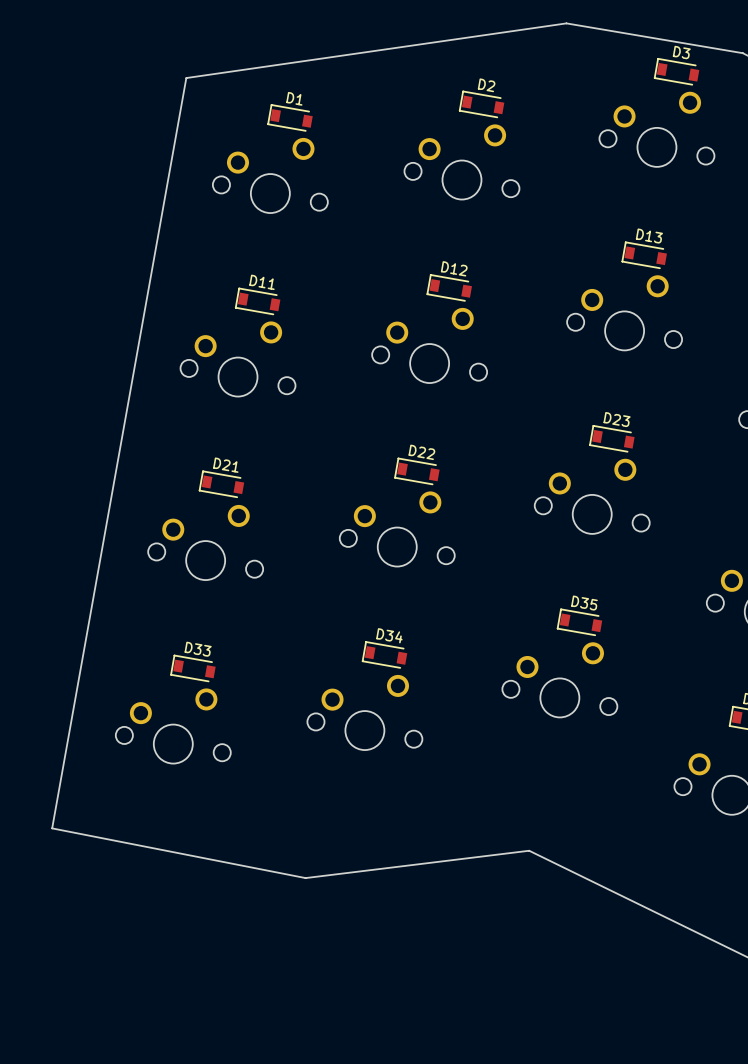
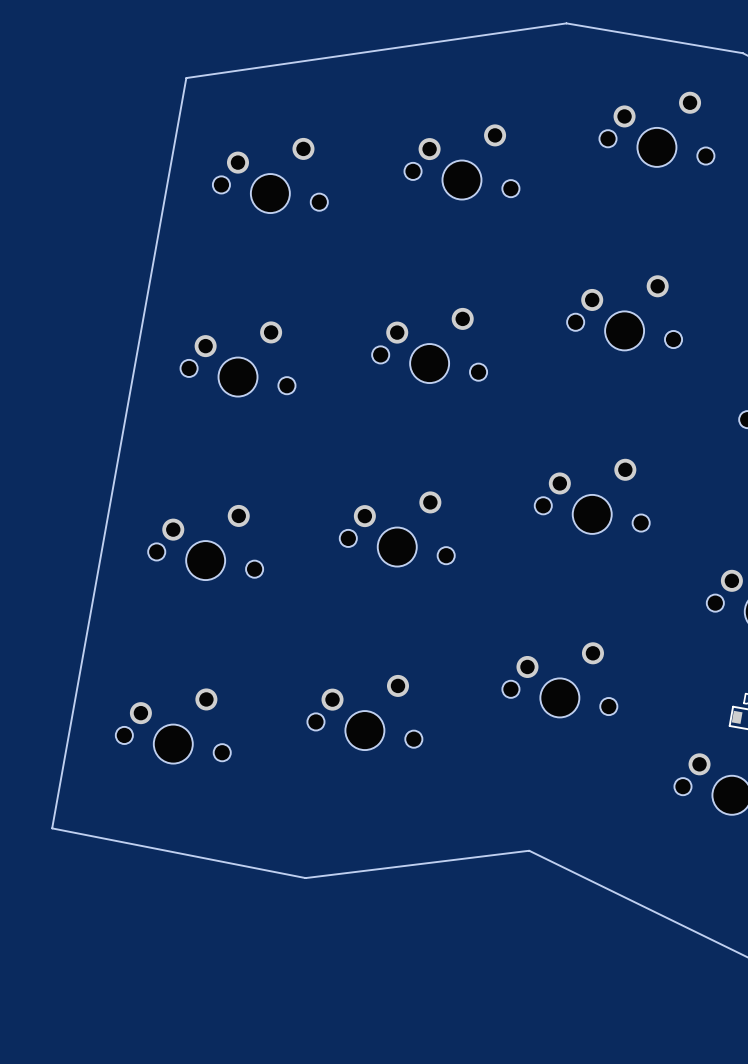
D3: (676, 71) -> none
D2: (481, 104) -> none
D1: (290, 117) -> none
D13: (644, 255) -> none
D12: (449, 287) -> none
D11: (257, 301) -> none
D23: (612, 438) -> none
D22: (417, 471) -> none
D21: (221, 484) -> none
D35: (579, 622) -> none
D34: (384, 654) -> none
D33: (193, 668) -> none

